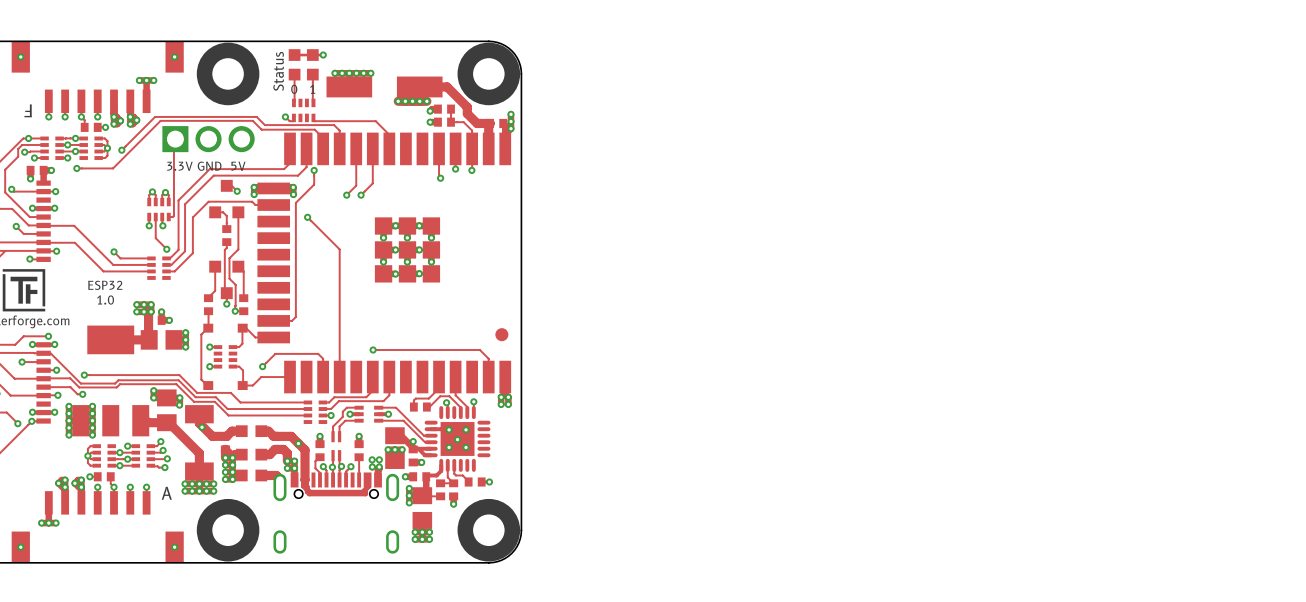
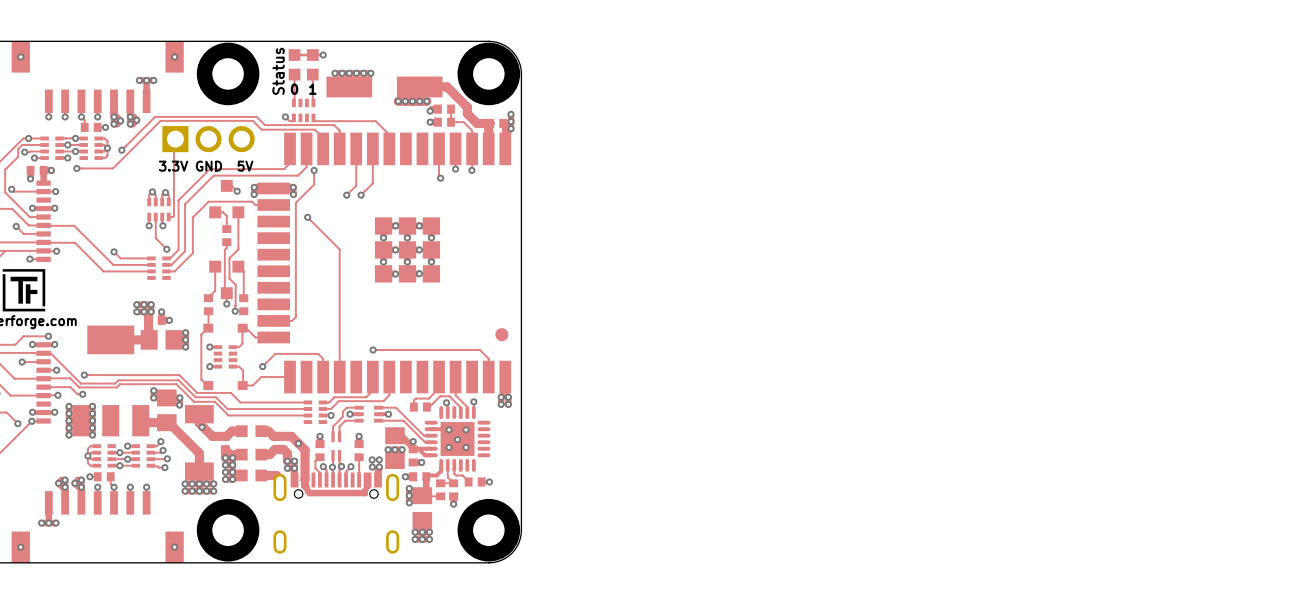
text: F (28, 110) -> none
text: ESP32 (105, 285) -> none
text: 1.0 (105, 300) -> none
text: A (166, 493) -> none

